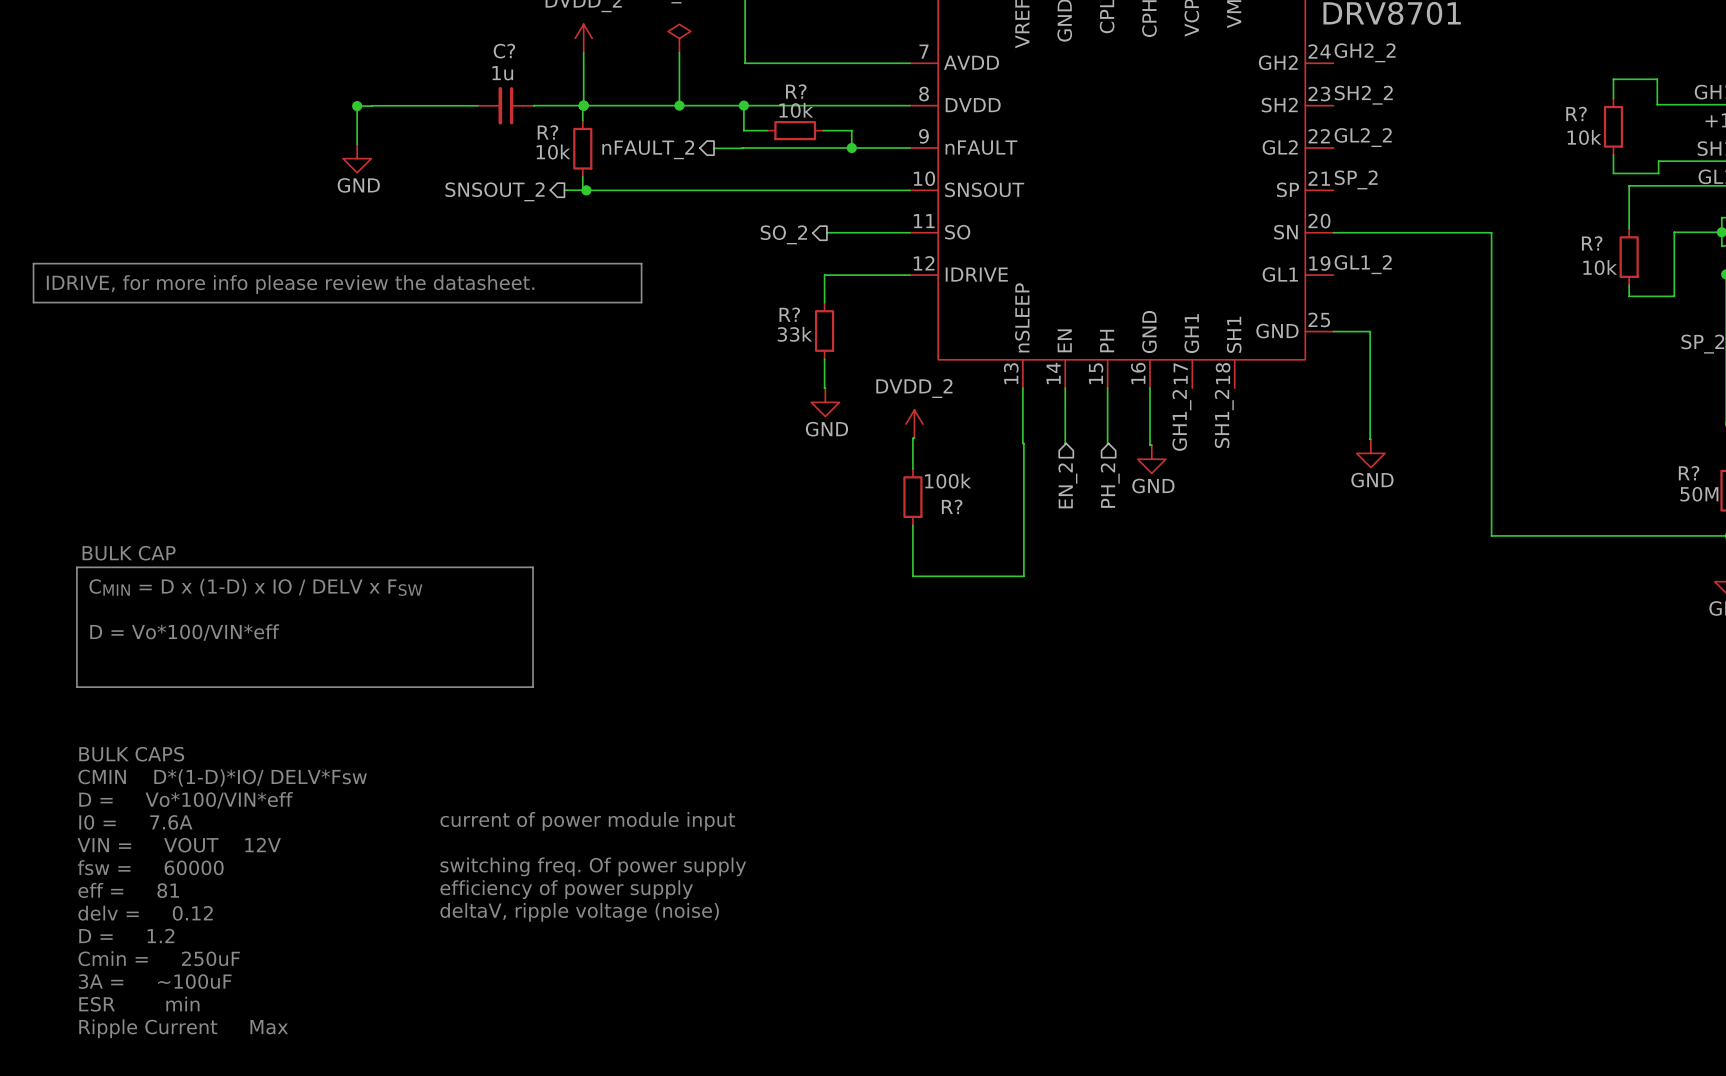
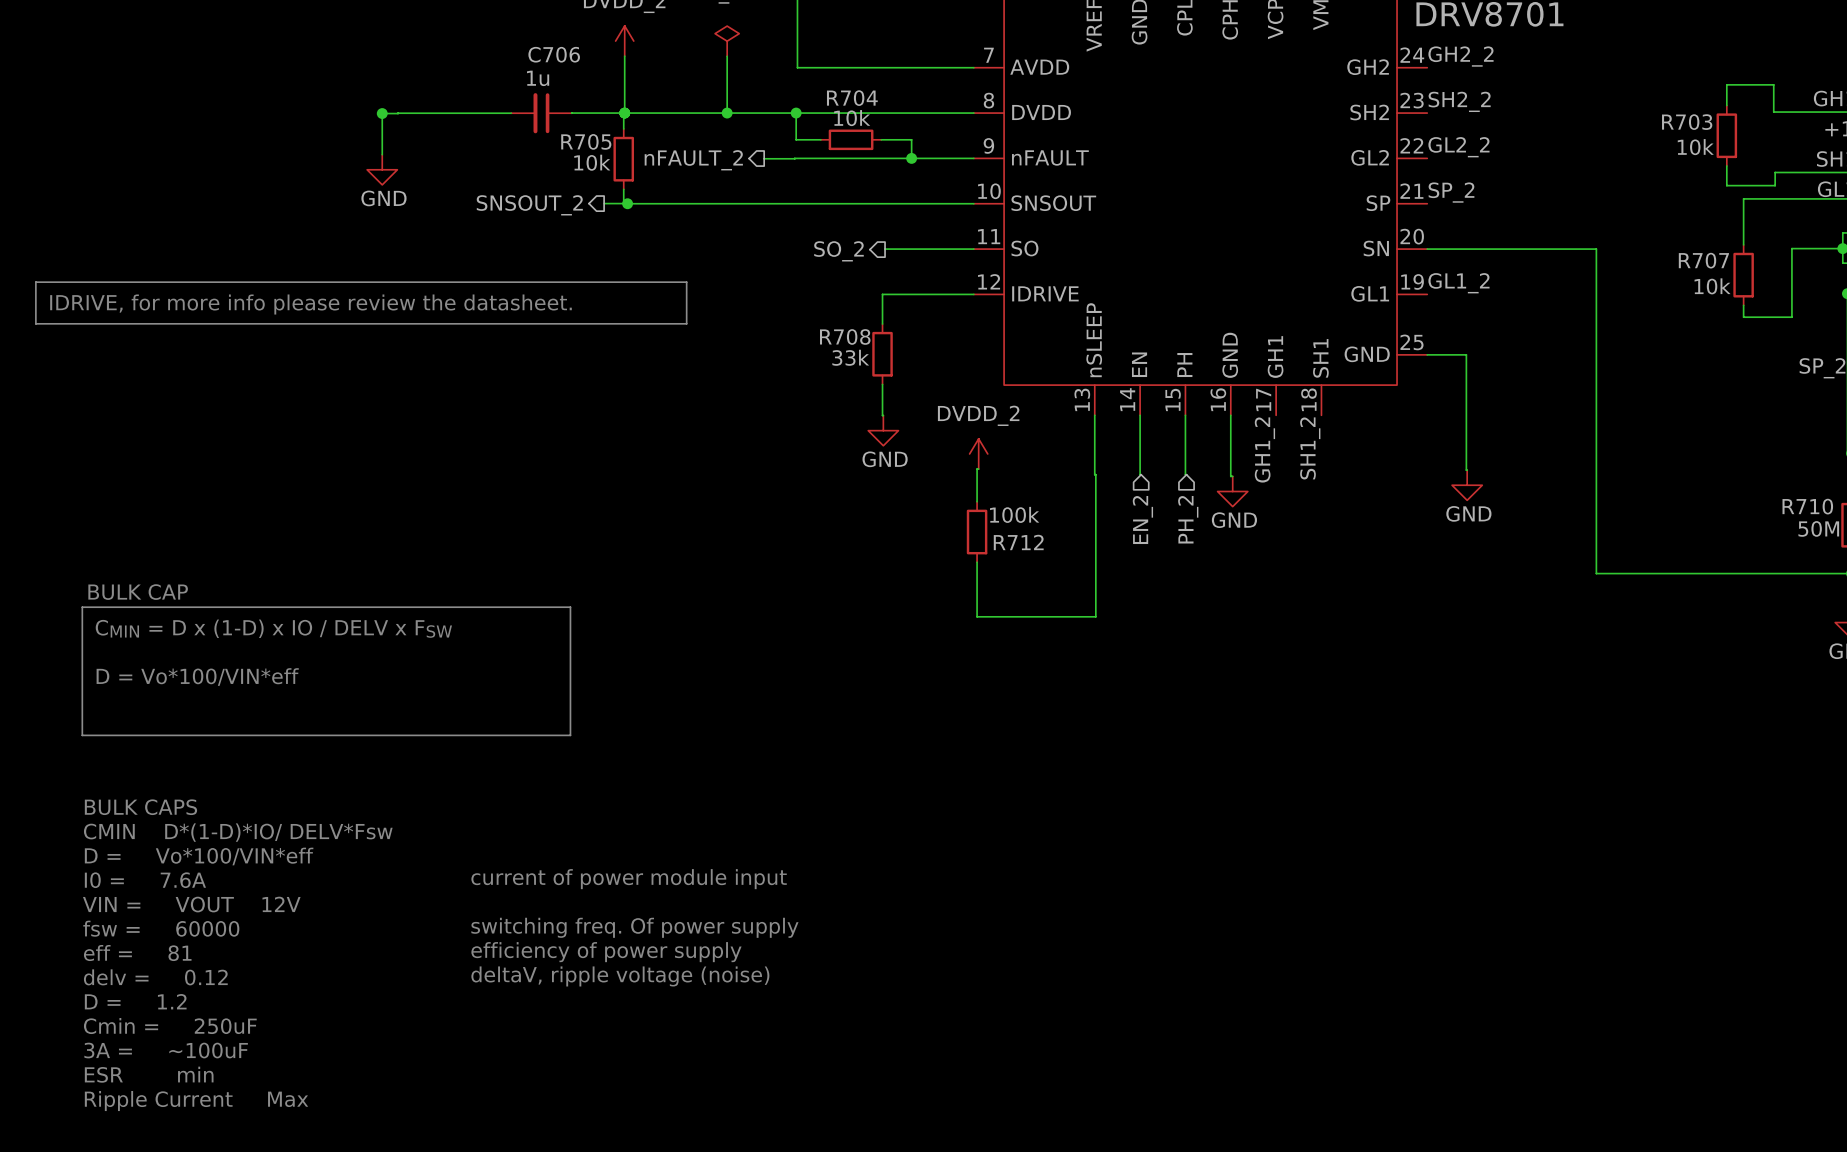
C? name: C? (504, 51) -> C706 (554, 54)
R? name: R? (796, 91) -> R704 (852, 98)
R? name: R? (1576, 113) -> R703 (1687, 122)
R? name: R? (547, 132) -> R705 (586, 141)
R? name: R? (1592, 243) -> R707 (1703, 260)
R? name: R? (789, 314) -> R708 (845, 336)
R? name: R? (1689, 473) -> R710 (1807, 506)
R? name: R? (952, 506) -> R712 (1018, 542)

